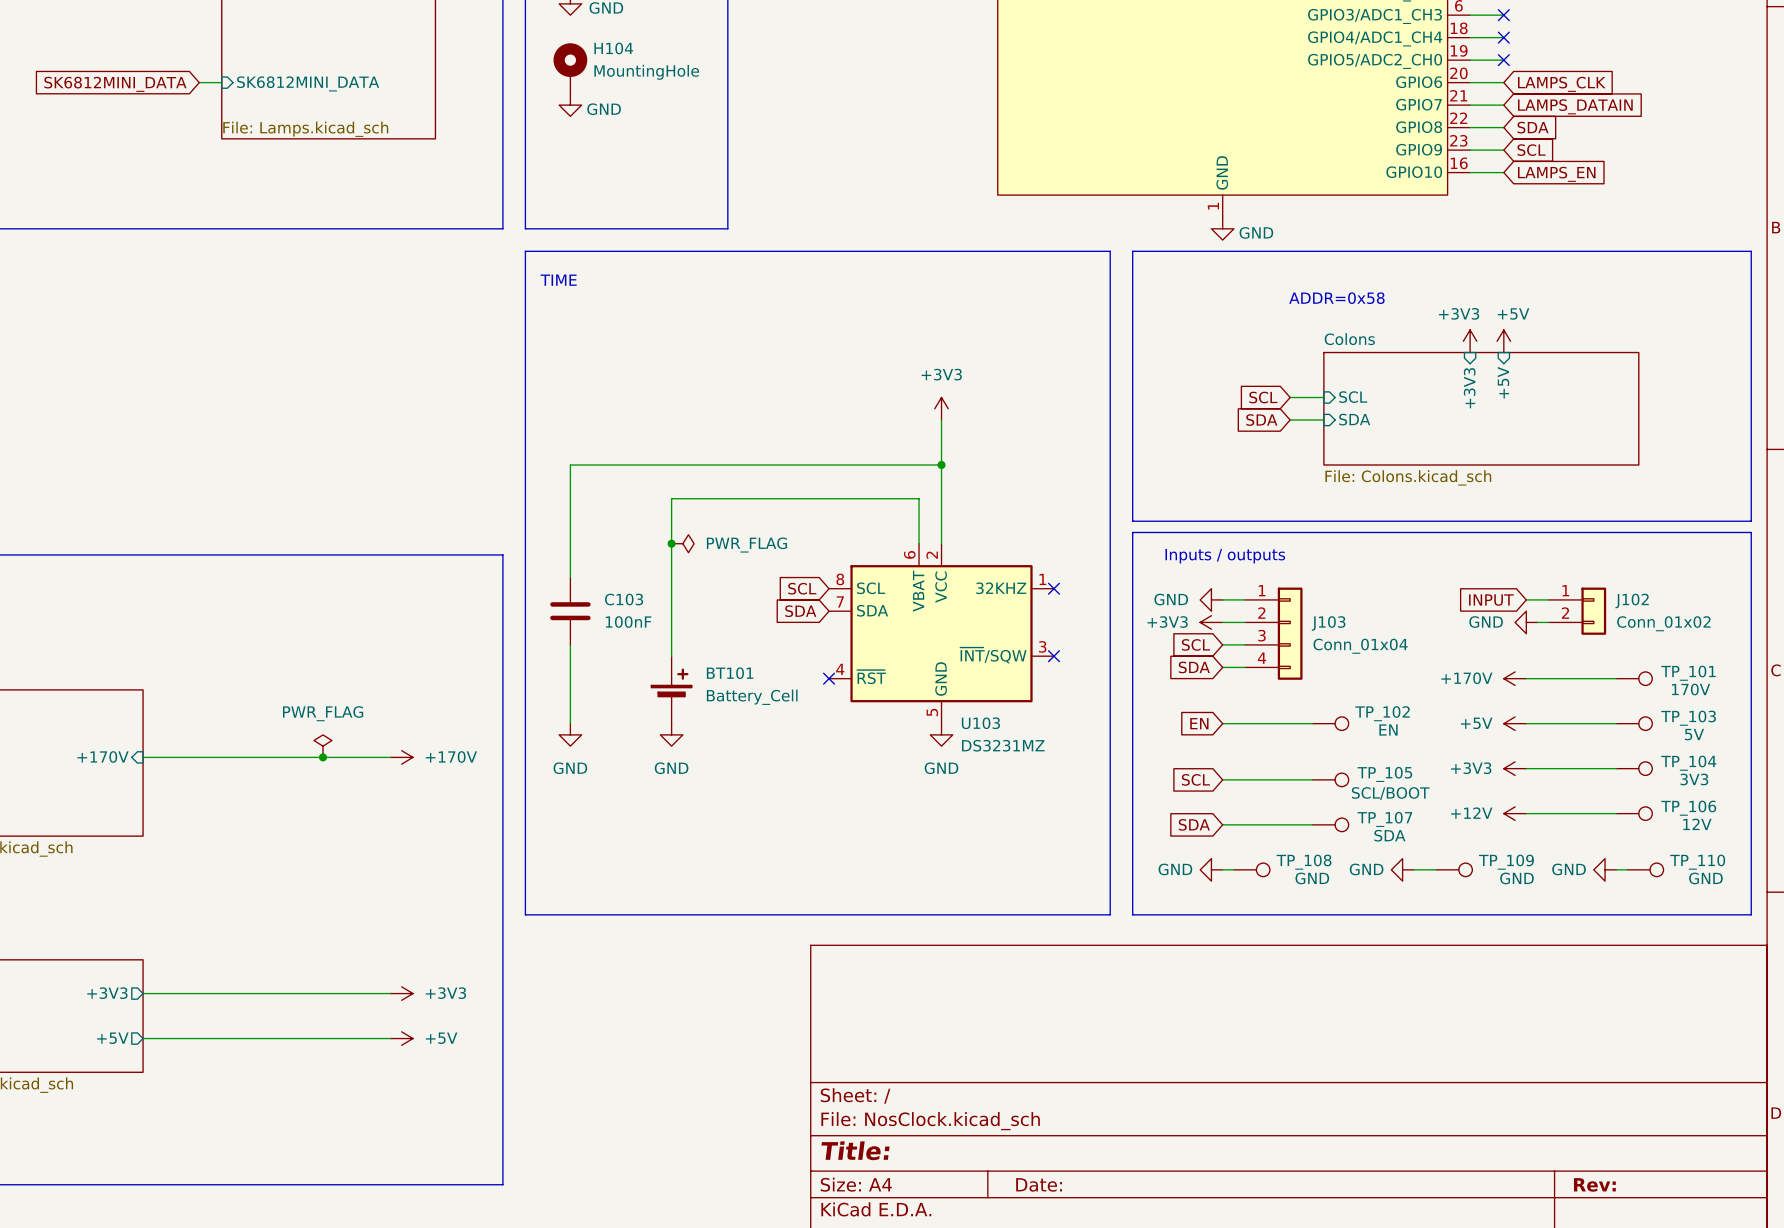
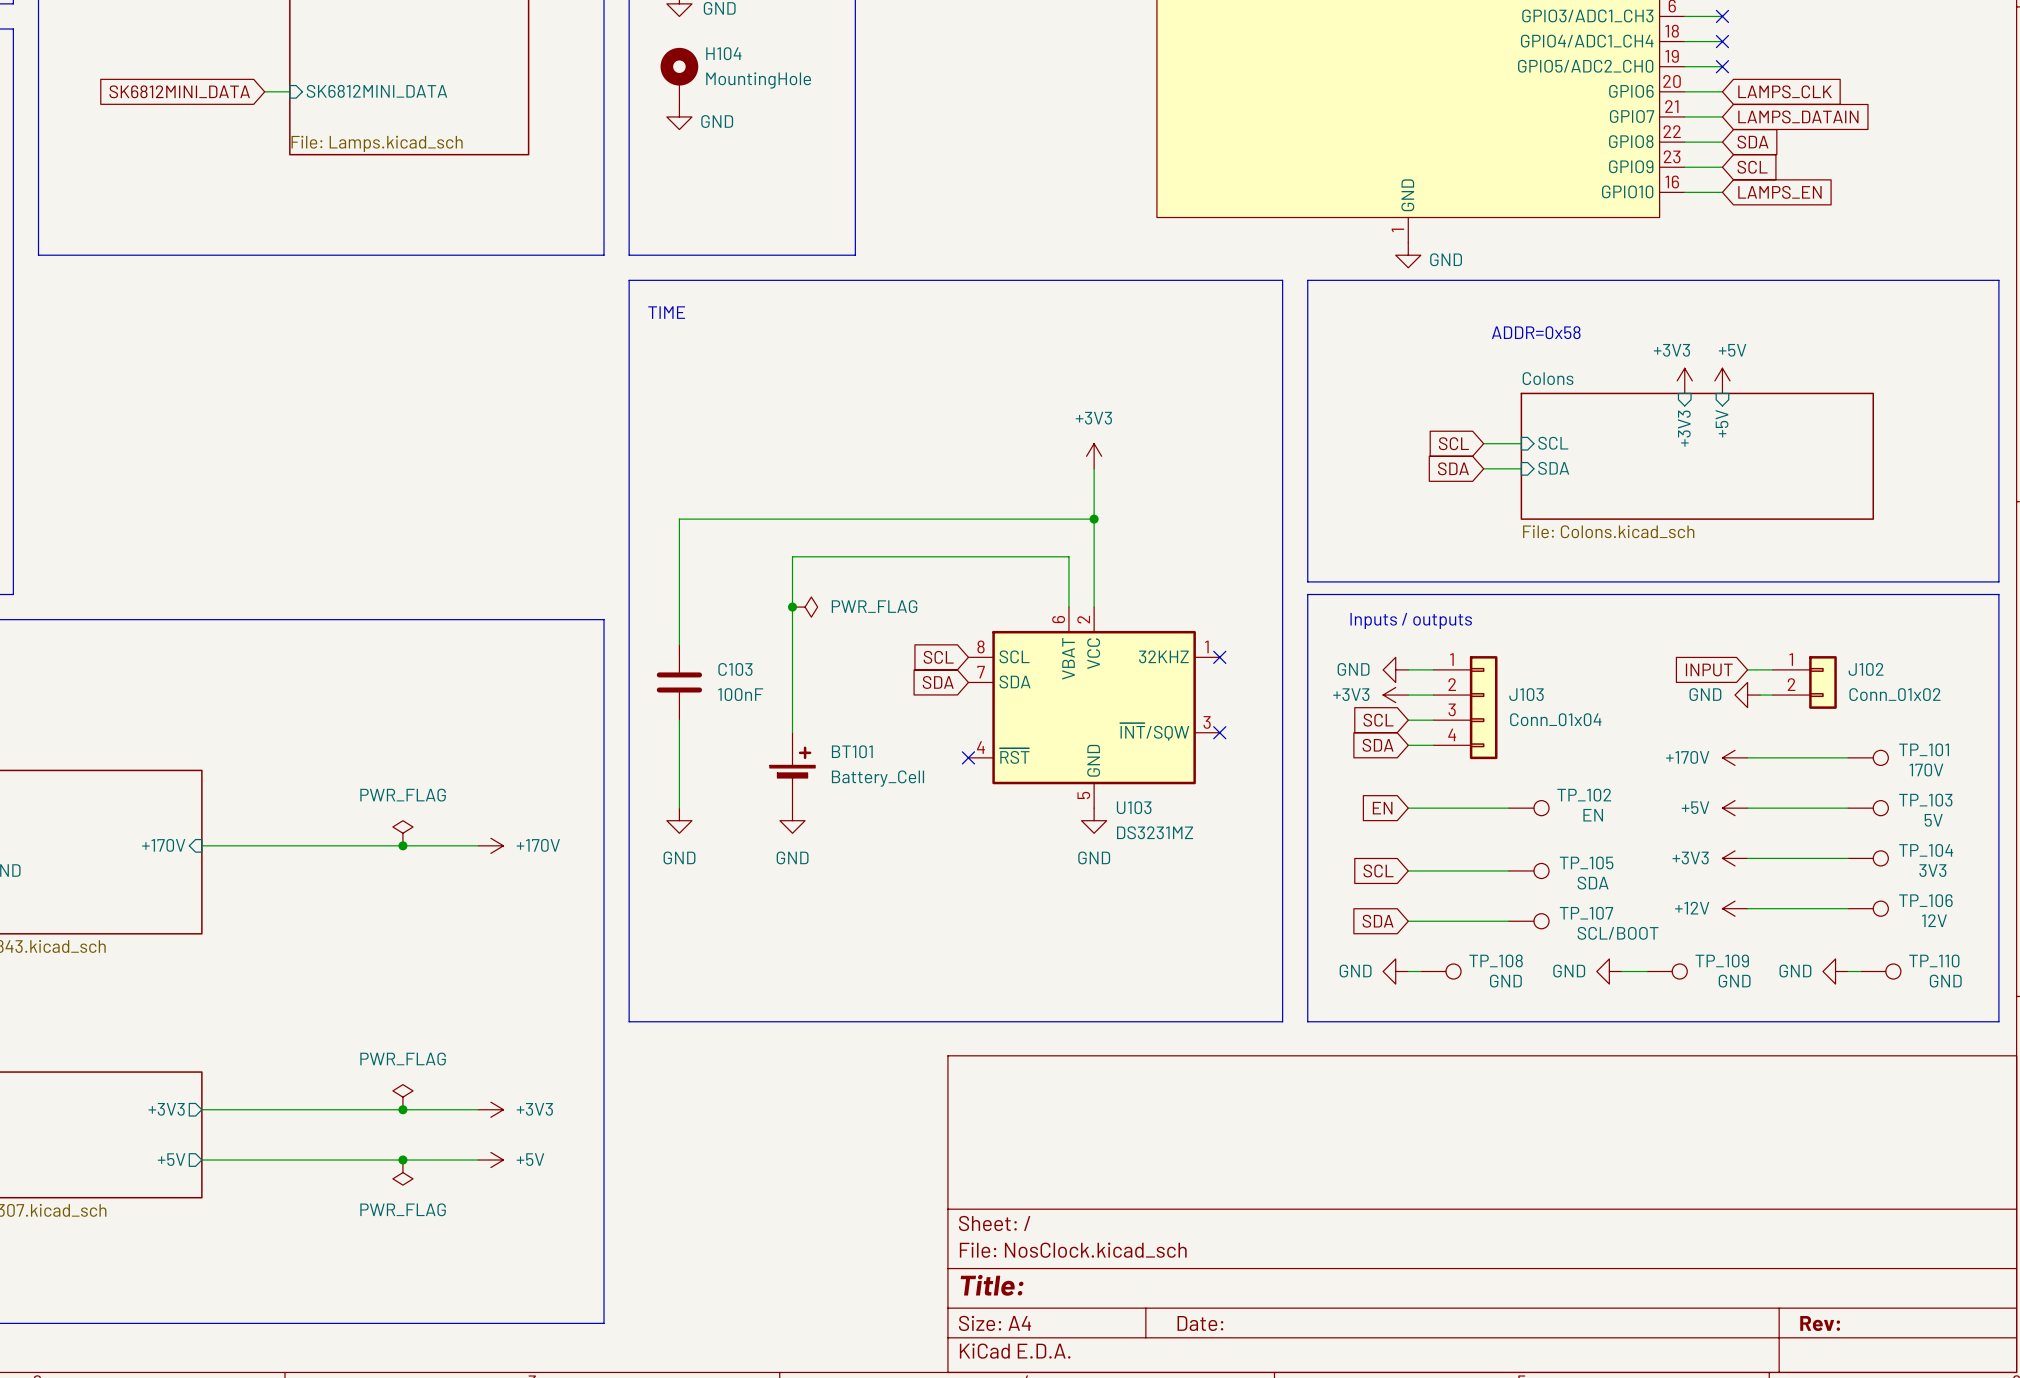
TP_105 value: SCL/BOOT (1390, 793) -> SDA (1593, 883)
TP_107 value: SDA (1389, 835) -> SCL/BOOT (1618, 933)
power symbol: none -> PWR_FLAG (402, 1097)
junction: none -> (402, 1109)
junction: none -> (402, 1160)
power symbol: none -> PWR_FLAG (402, 1172)

